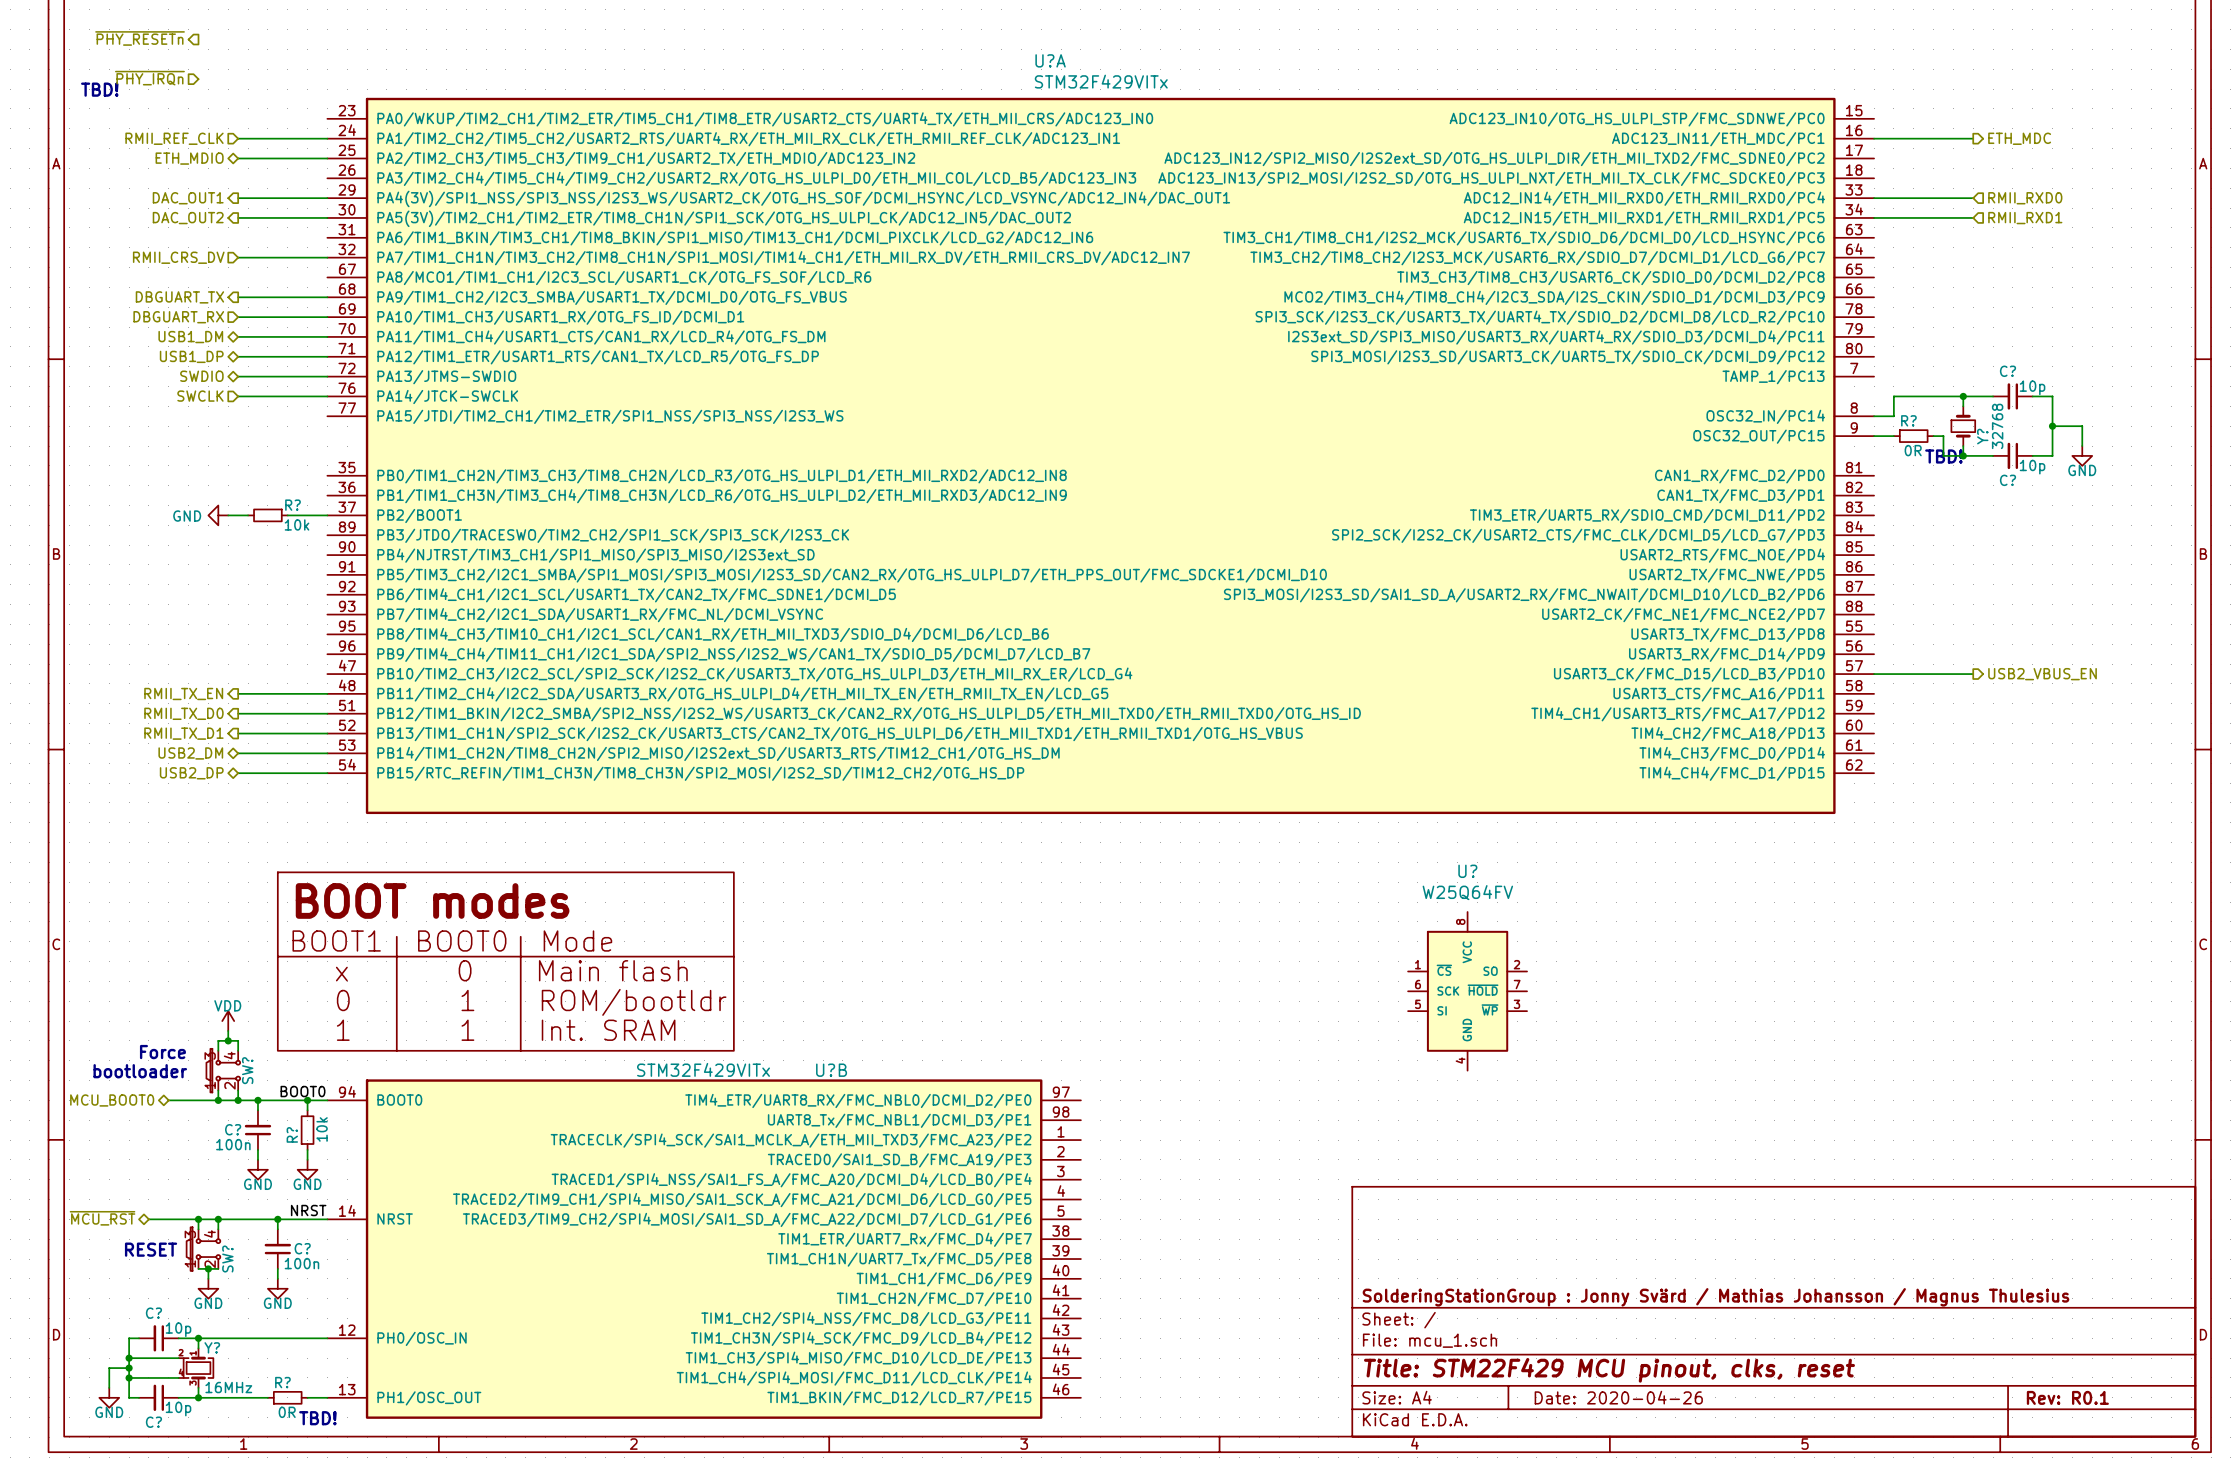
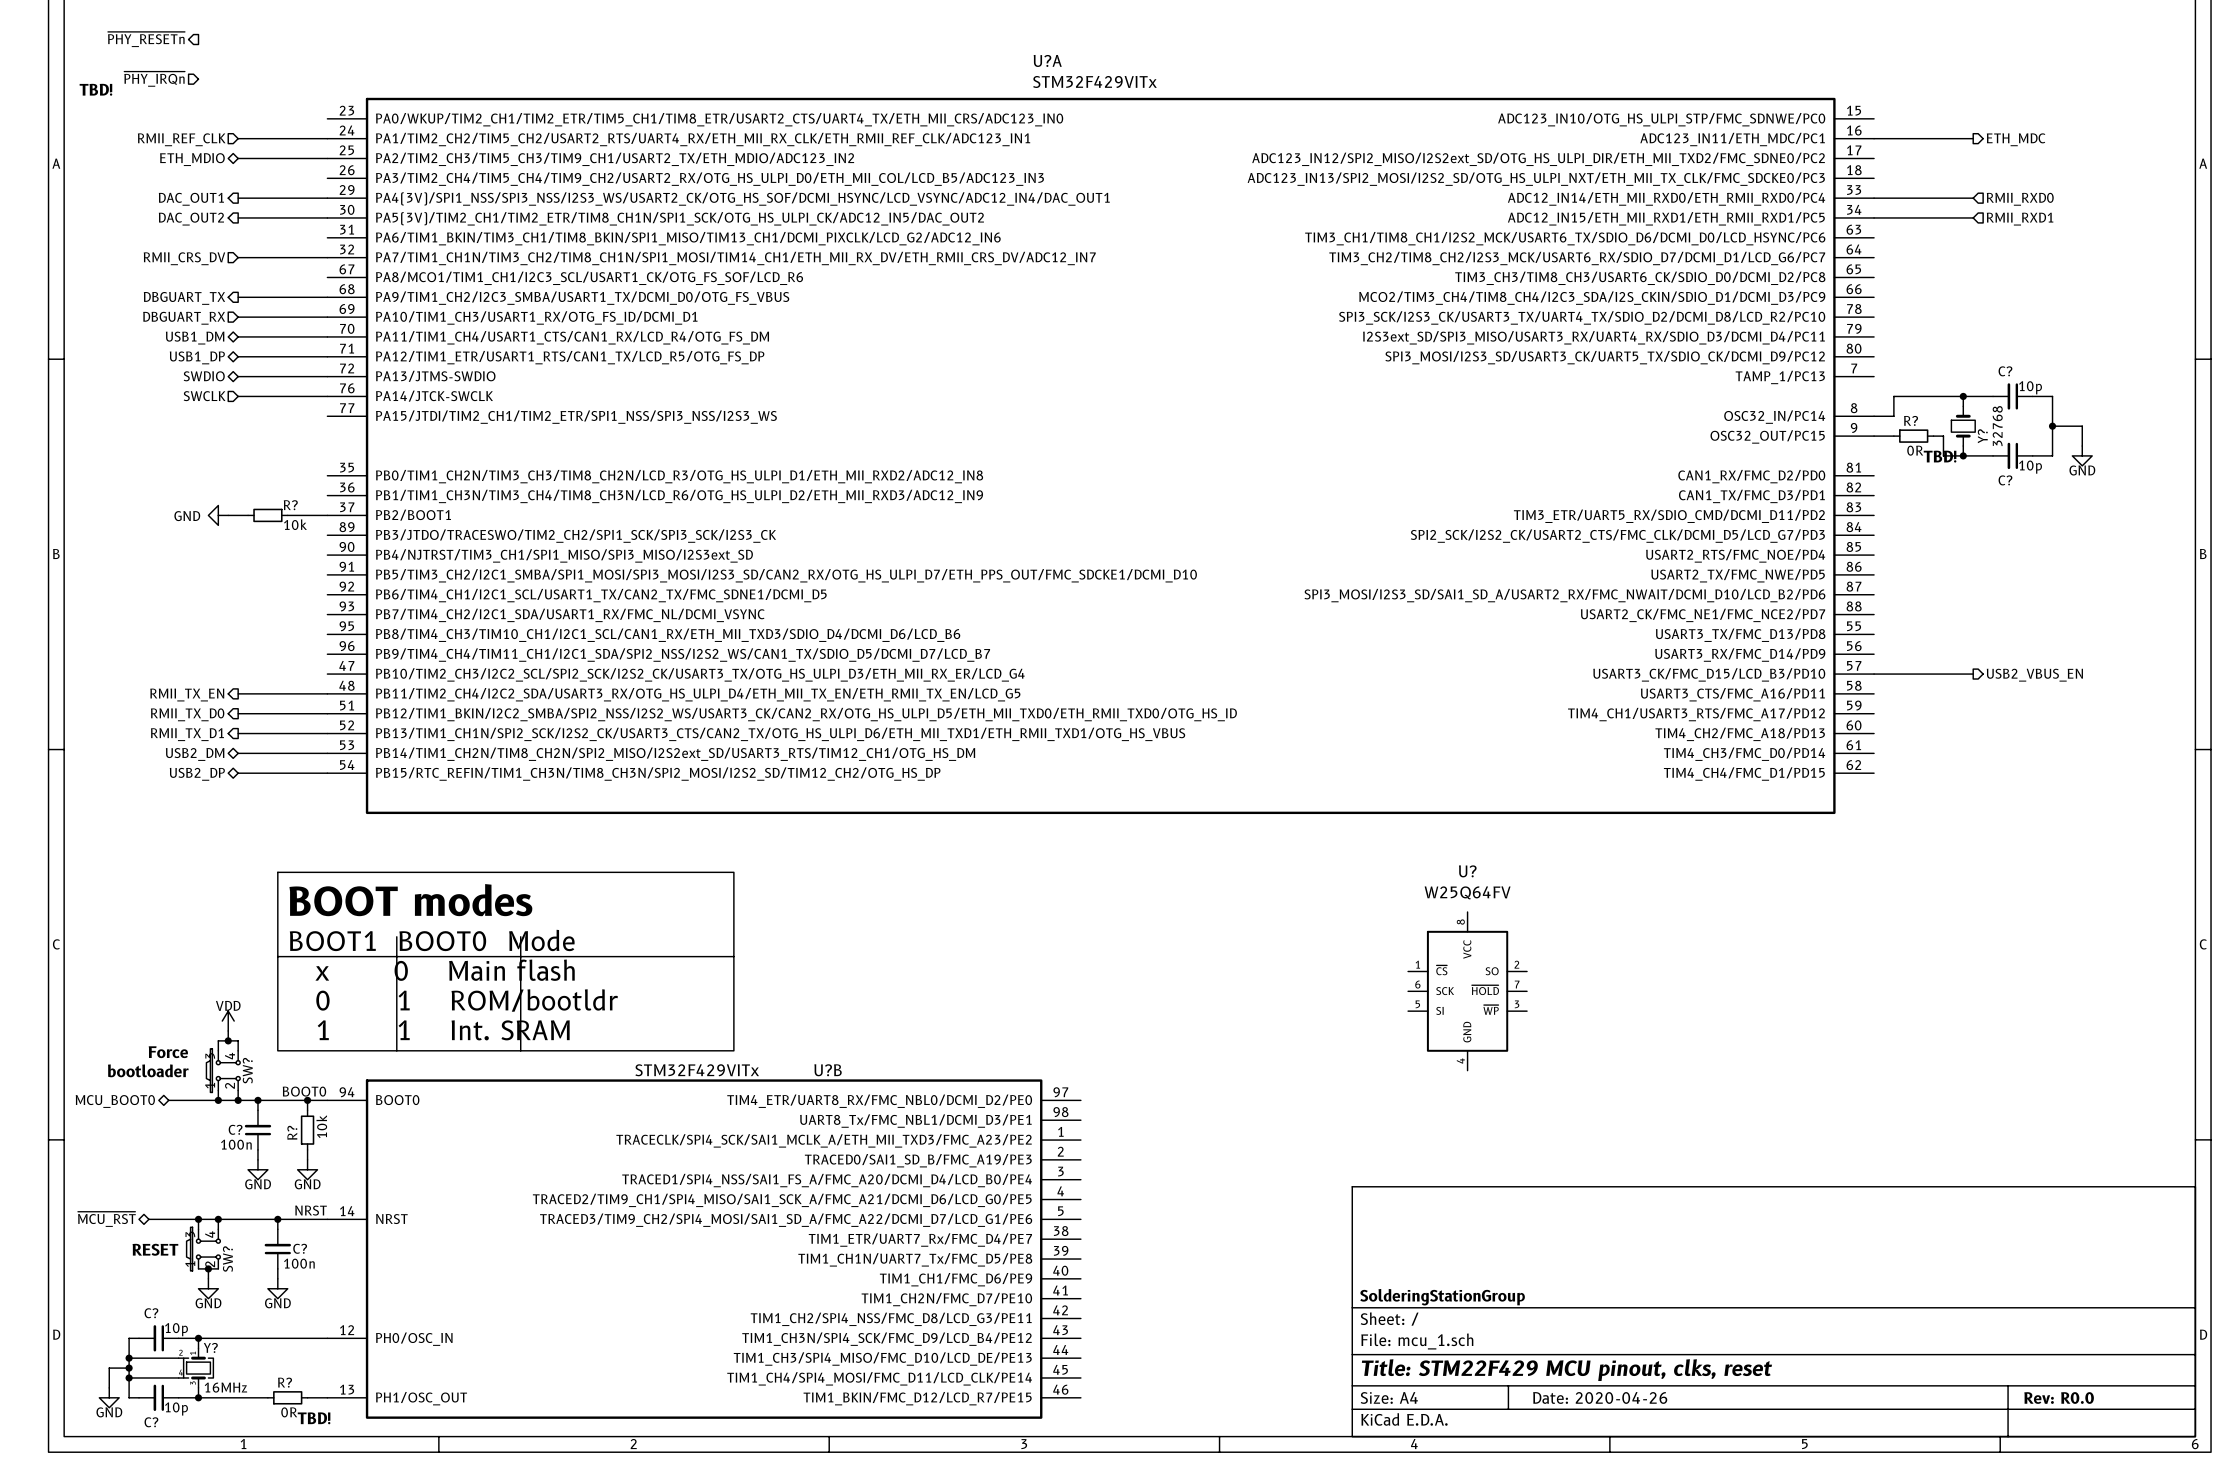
title block: SolderingStationGroup : Jonny Svärd / Mathias Johansson / Magnus Thulesius (1715, 1297) -> SolderingStationGroup (1442, 1297)
title block: Rev: R0.1 (2067, 1397) -> Rev: R0.0 (2059, 1398)

